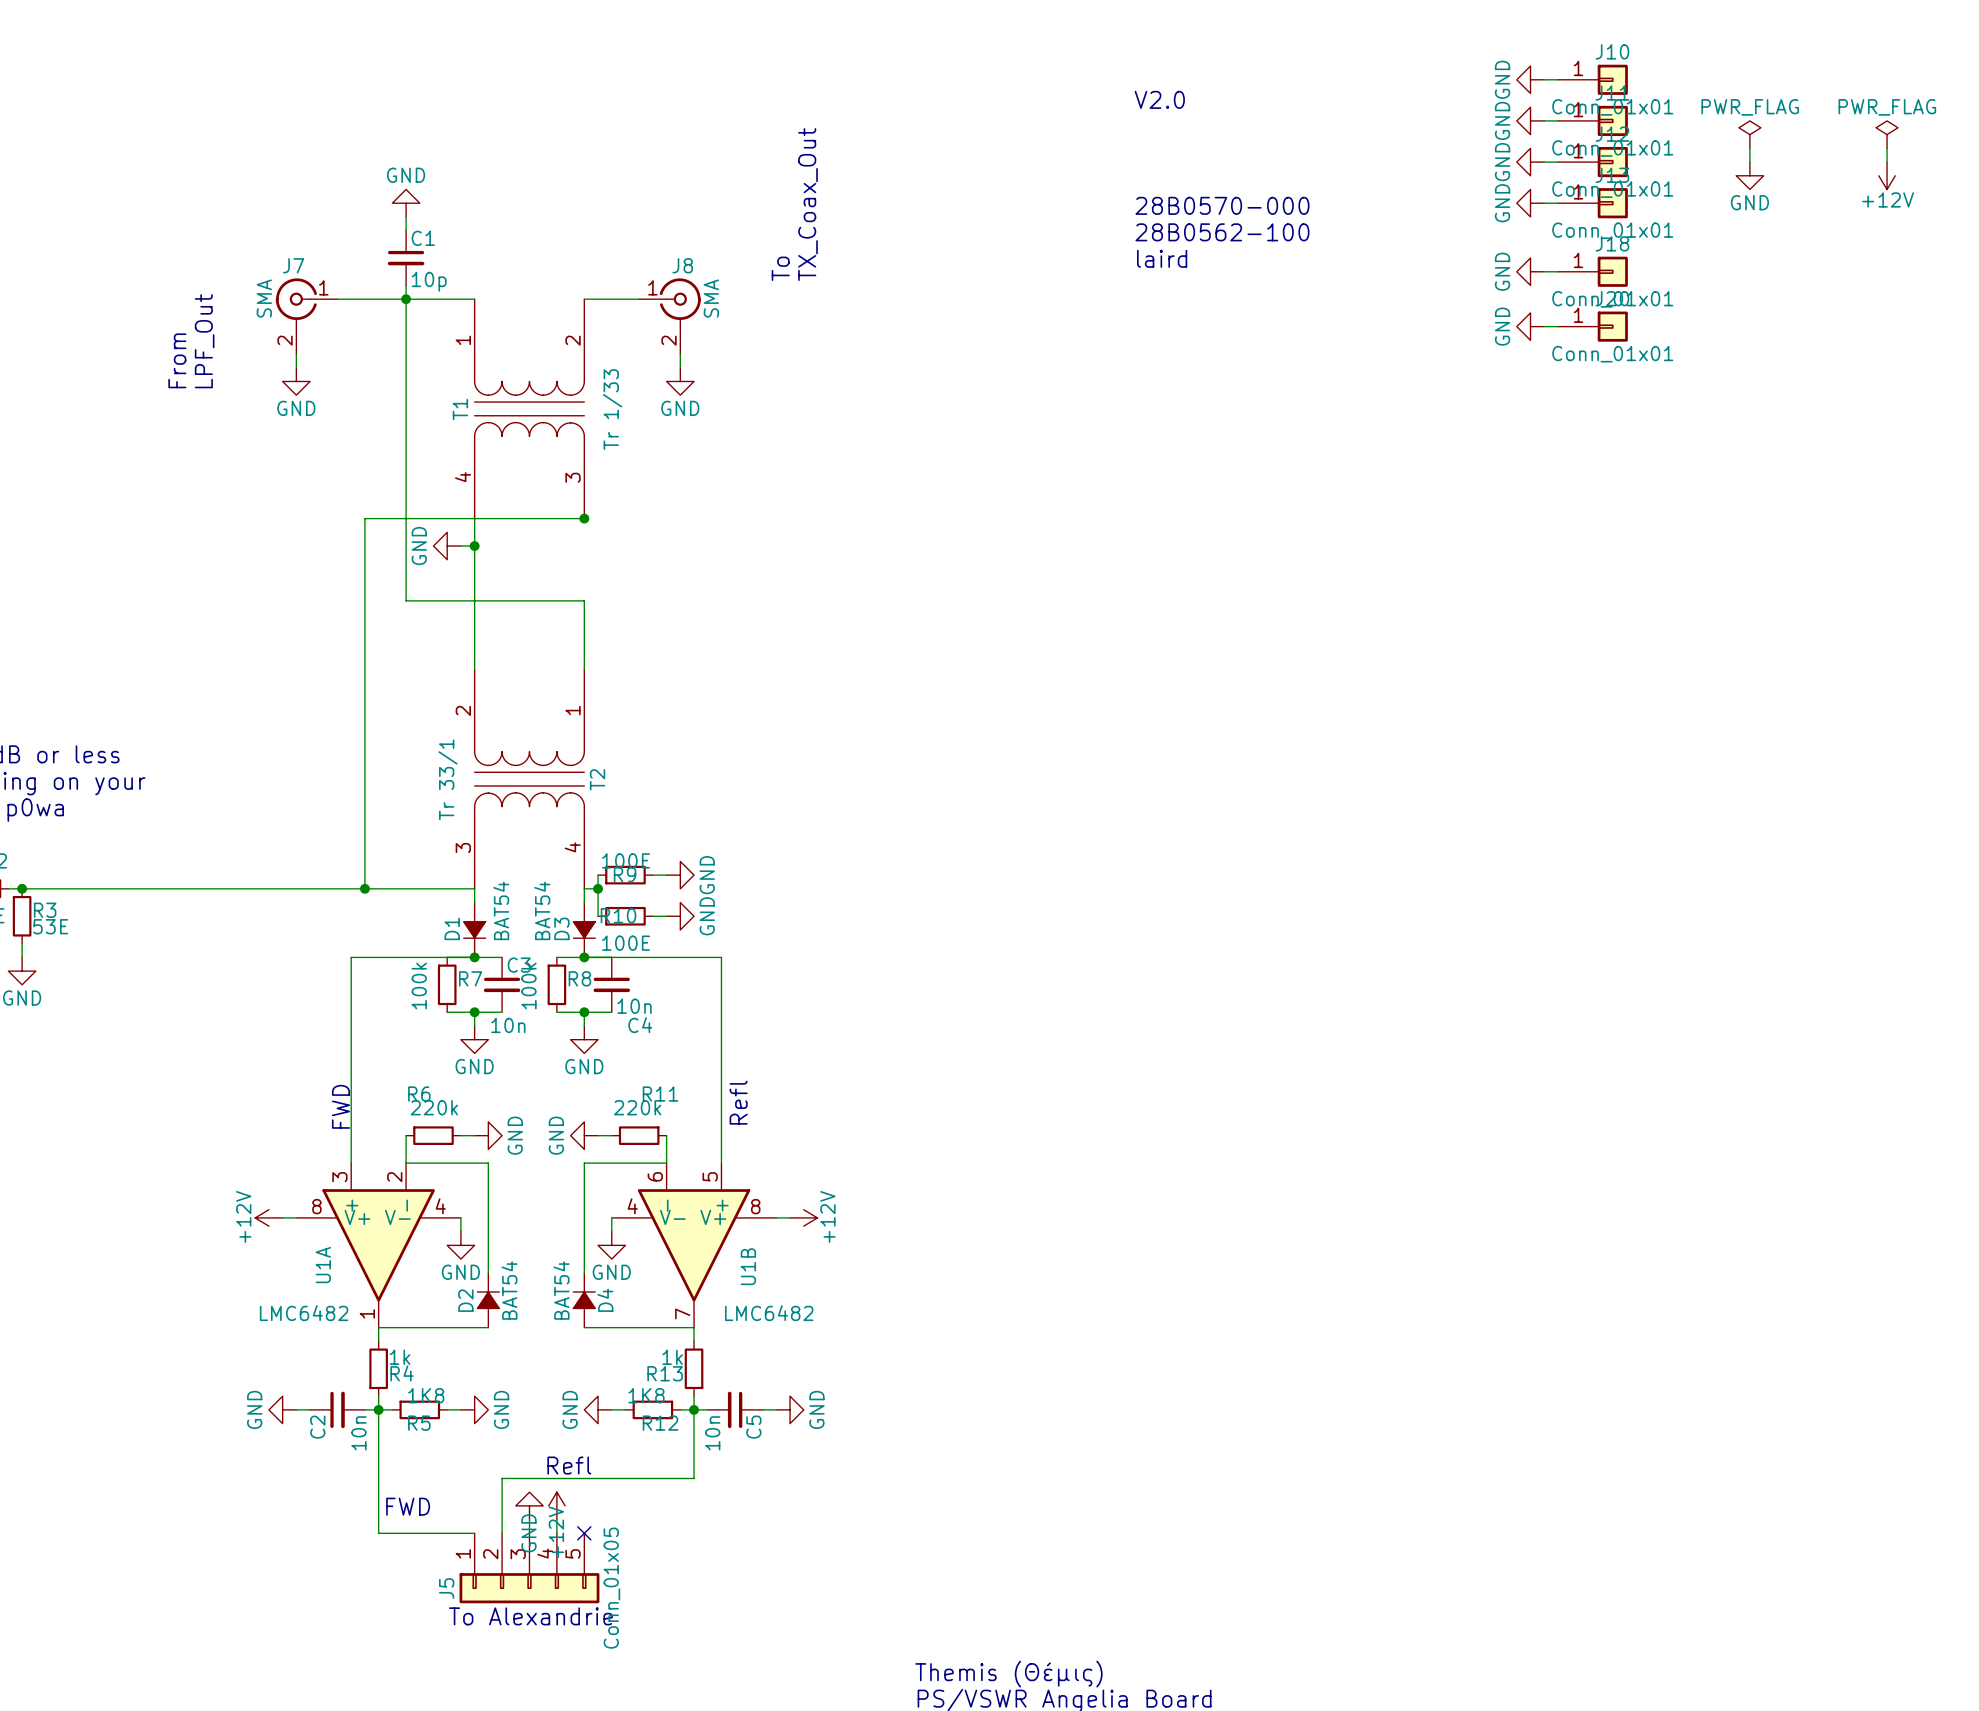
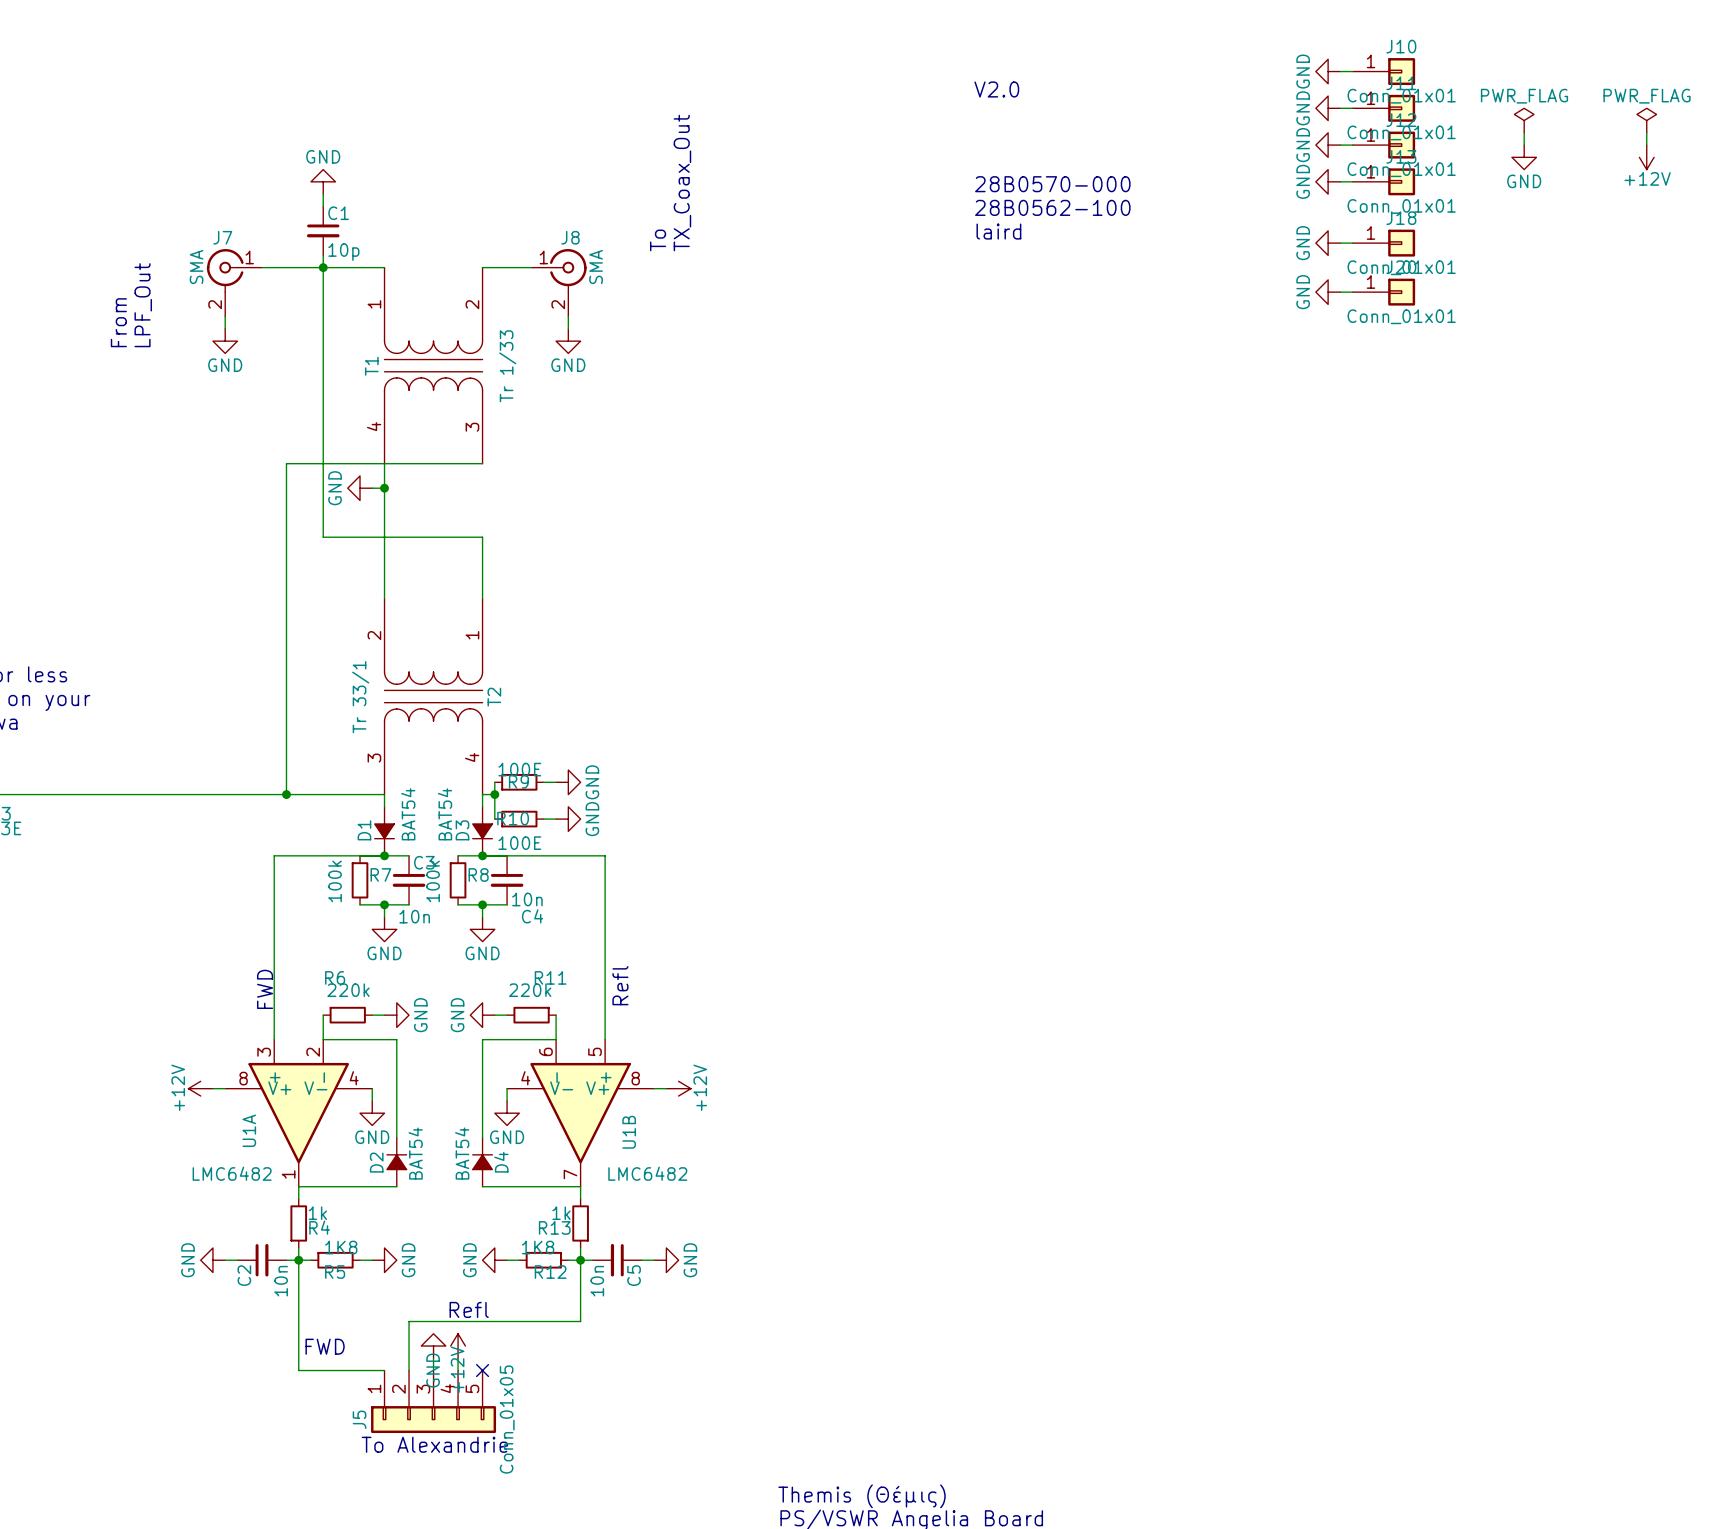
junction: (584, 518) -> none

